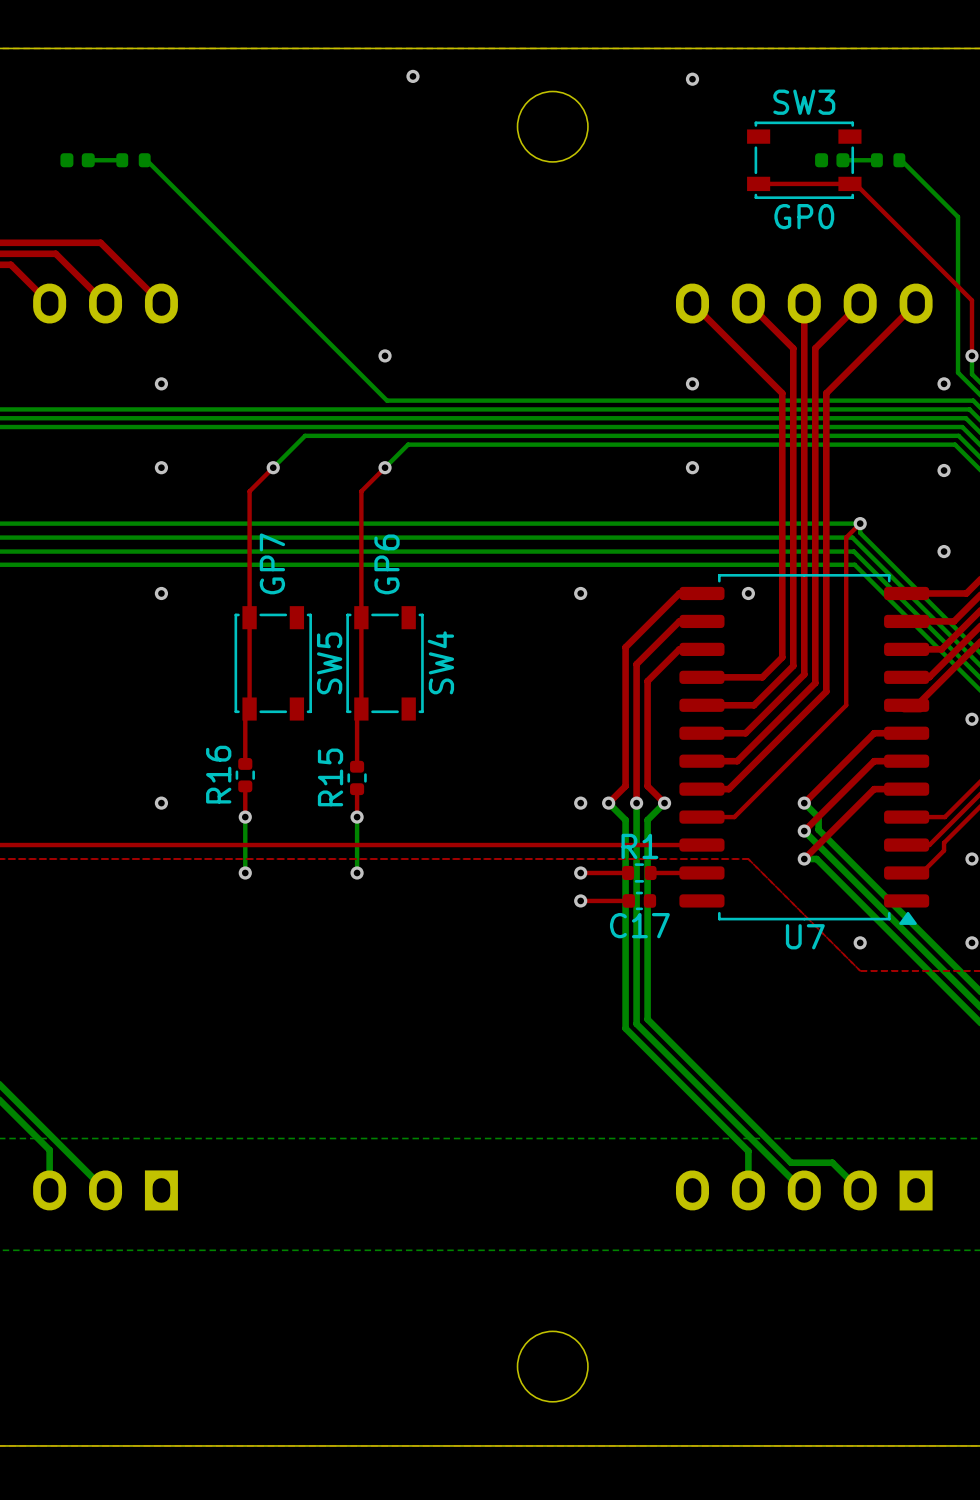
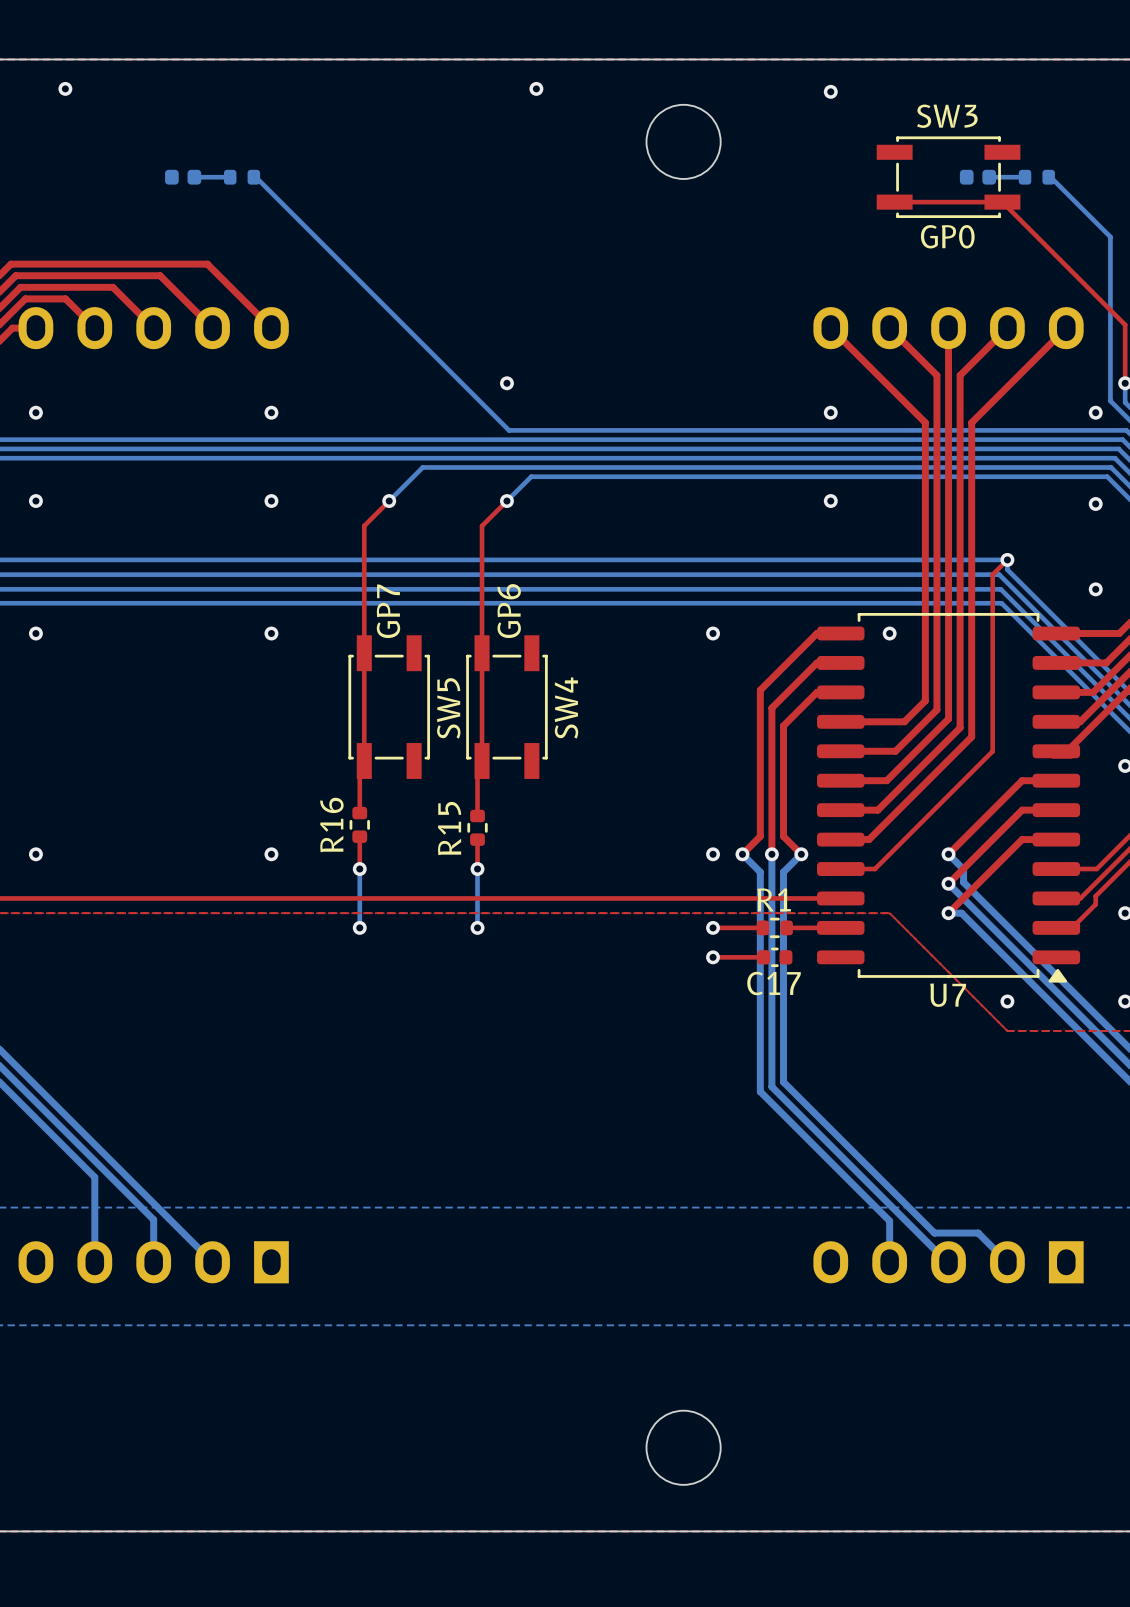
SW3 footprint: [747, 121, 862, 199] -> [876, 136, 1021, 219]
SW5 footprint: [234, 606, 312, 721] -> [348, 635, 431, 779]
SW4 footprint: [346, 606, 424, 721] -> [466, 635, 548, 779]

